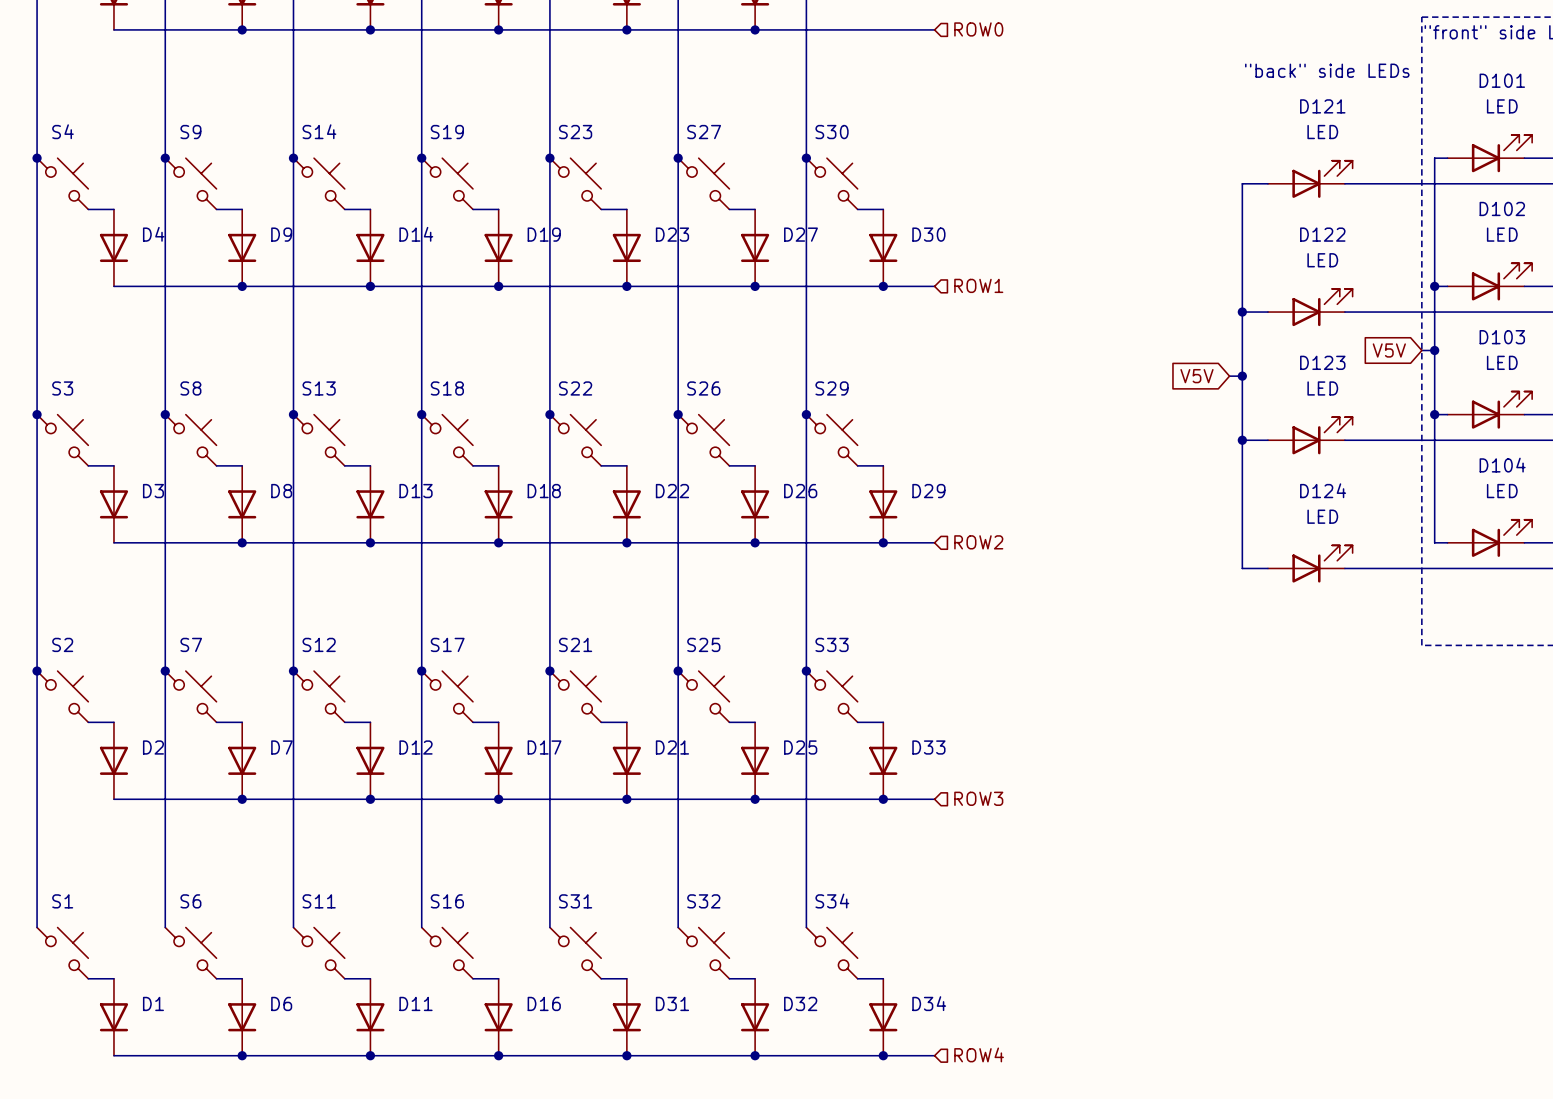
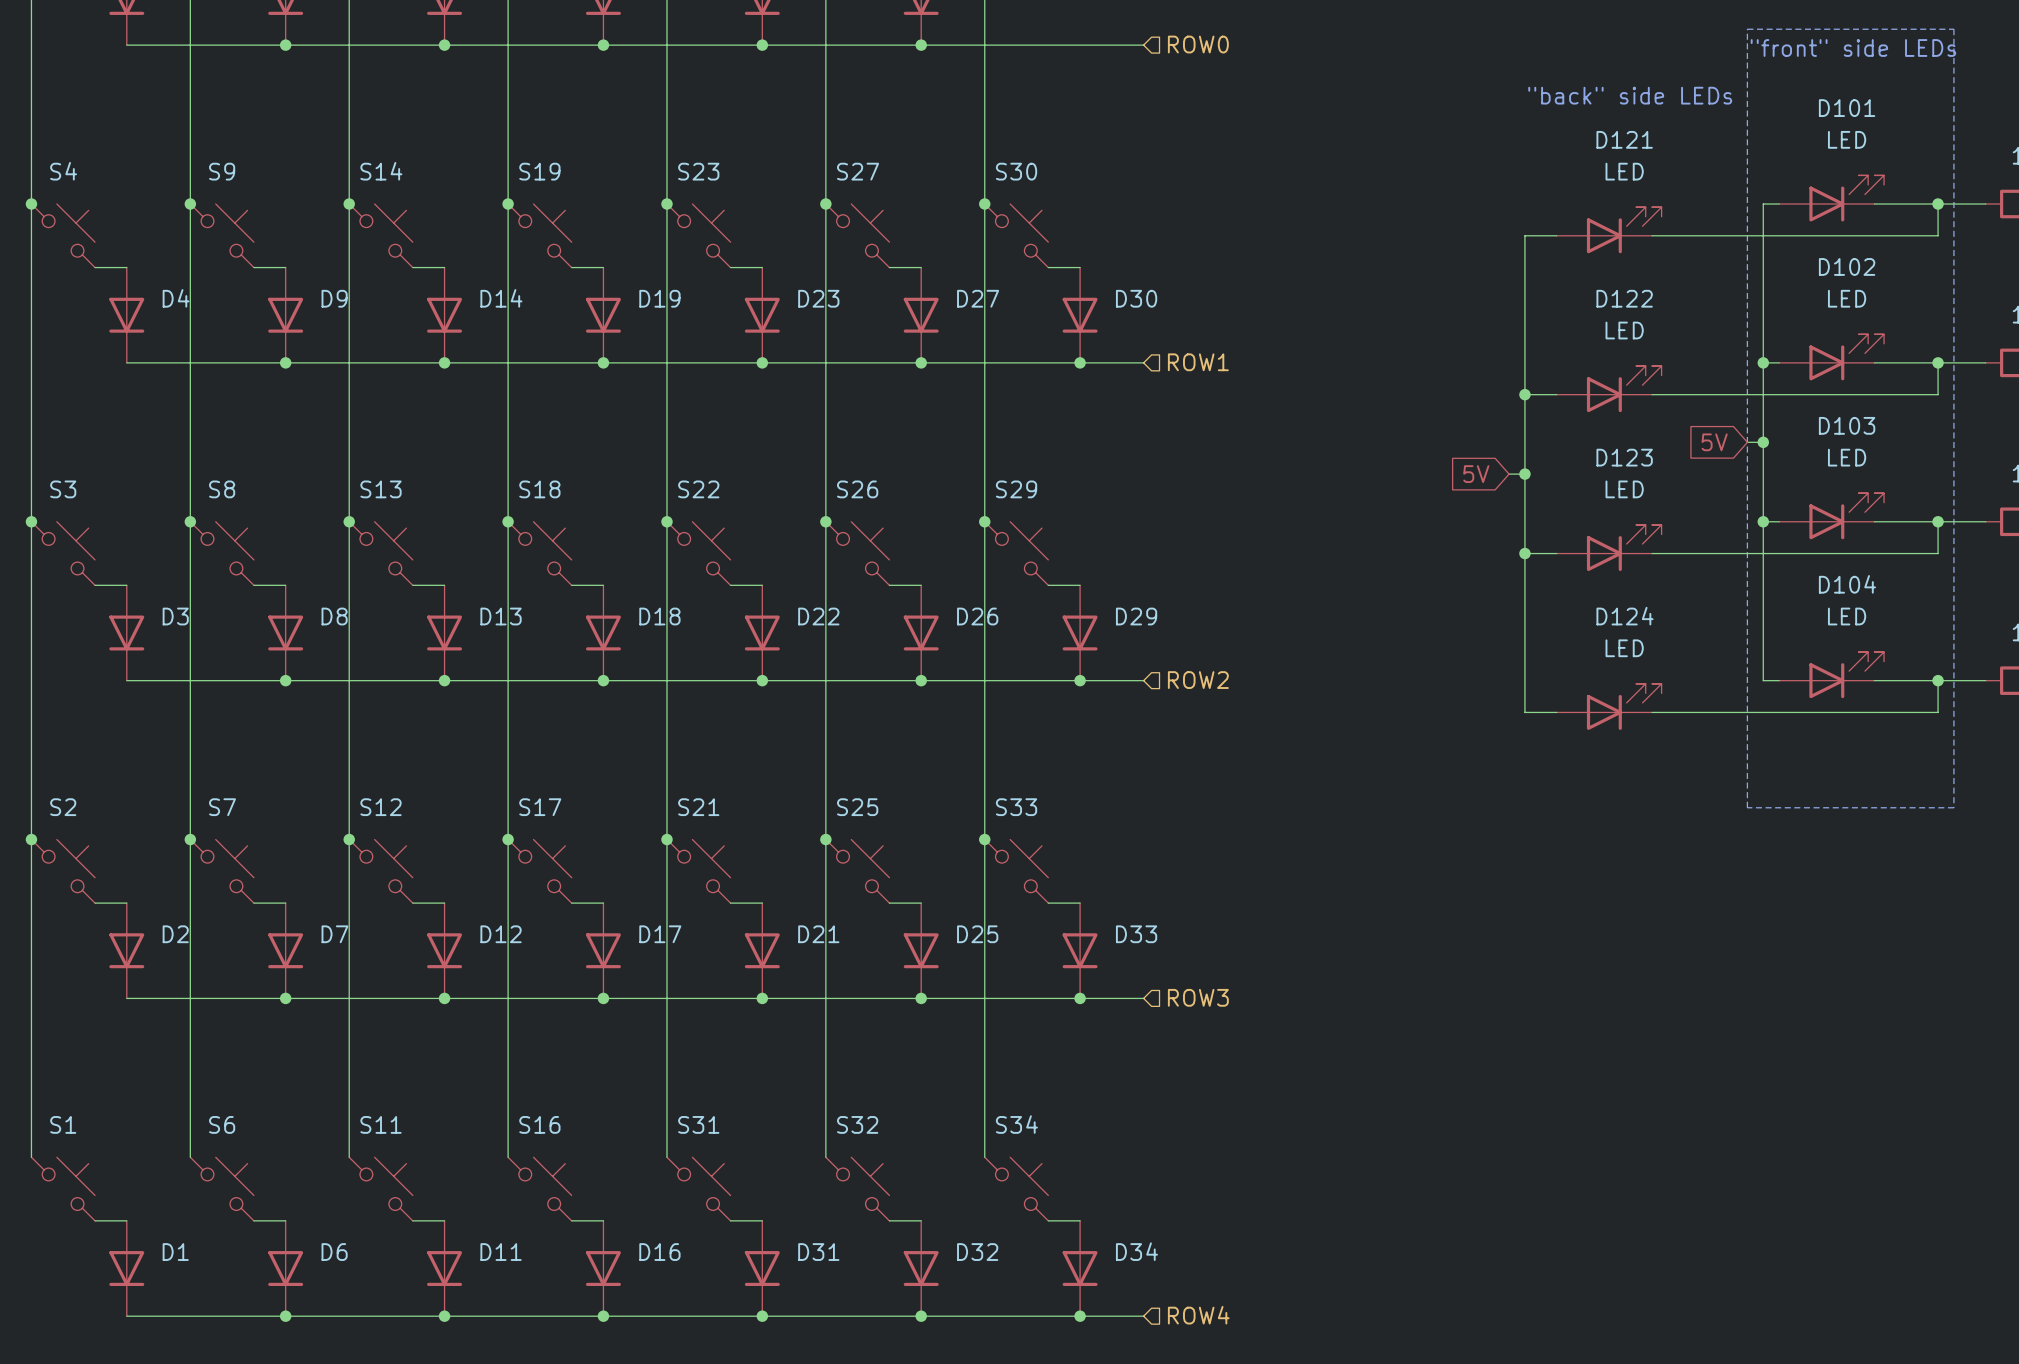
global label: V5V (1389, 350) -> 5V (1714, 442)
global label: V5V (1196, 376) -> 5V (1476, 474)

